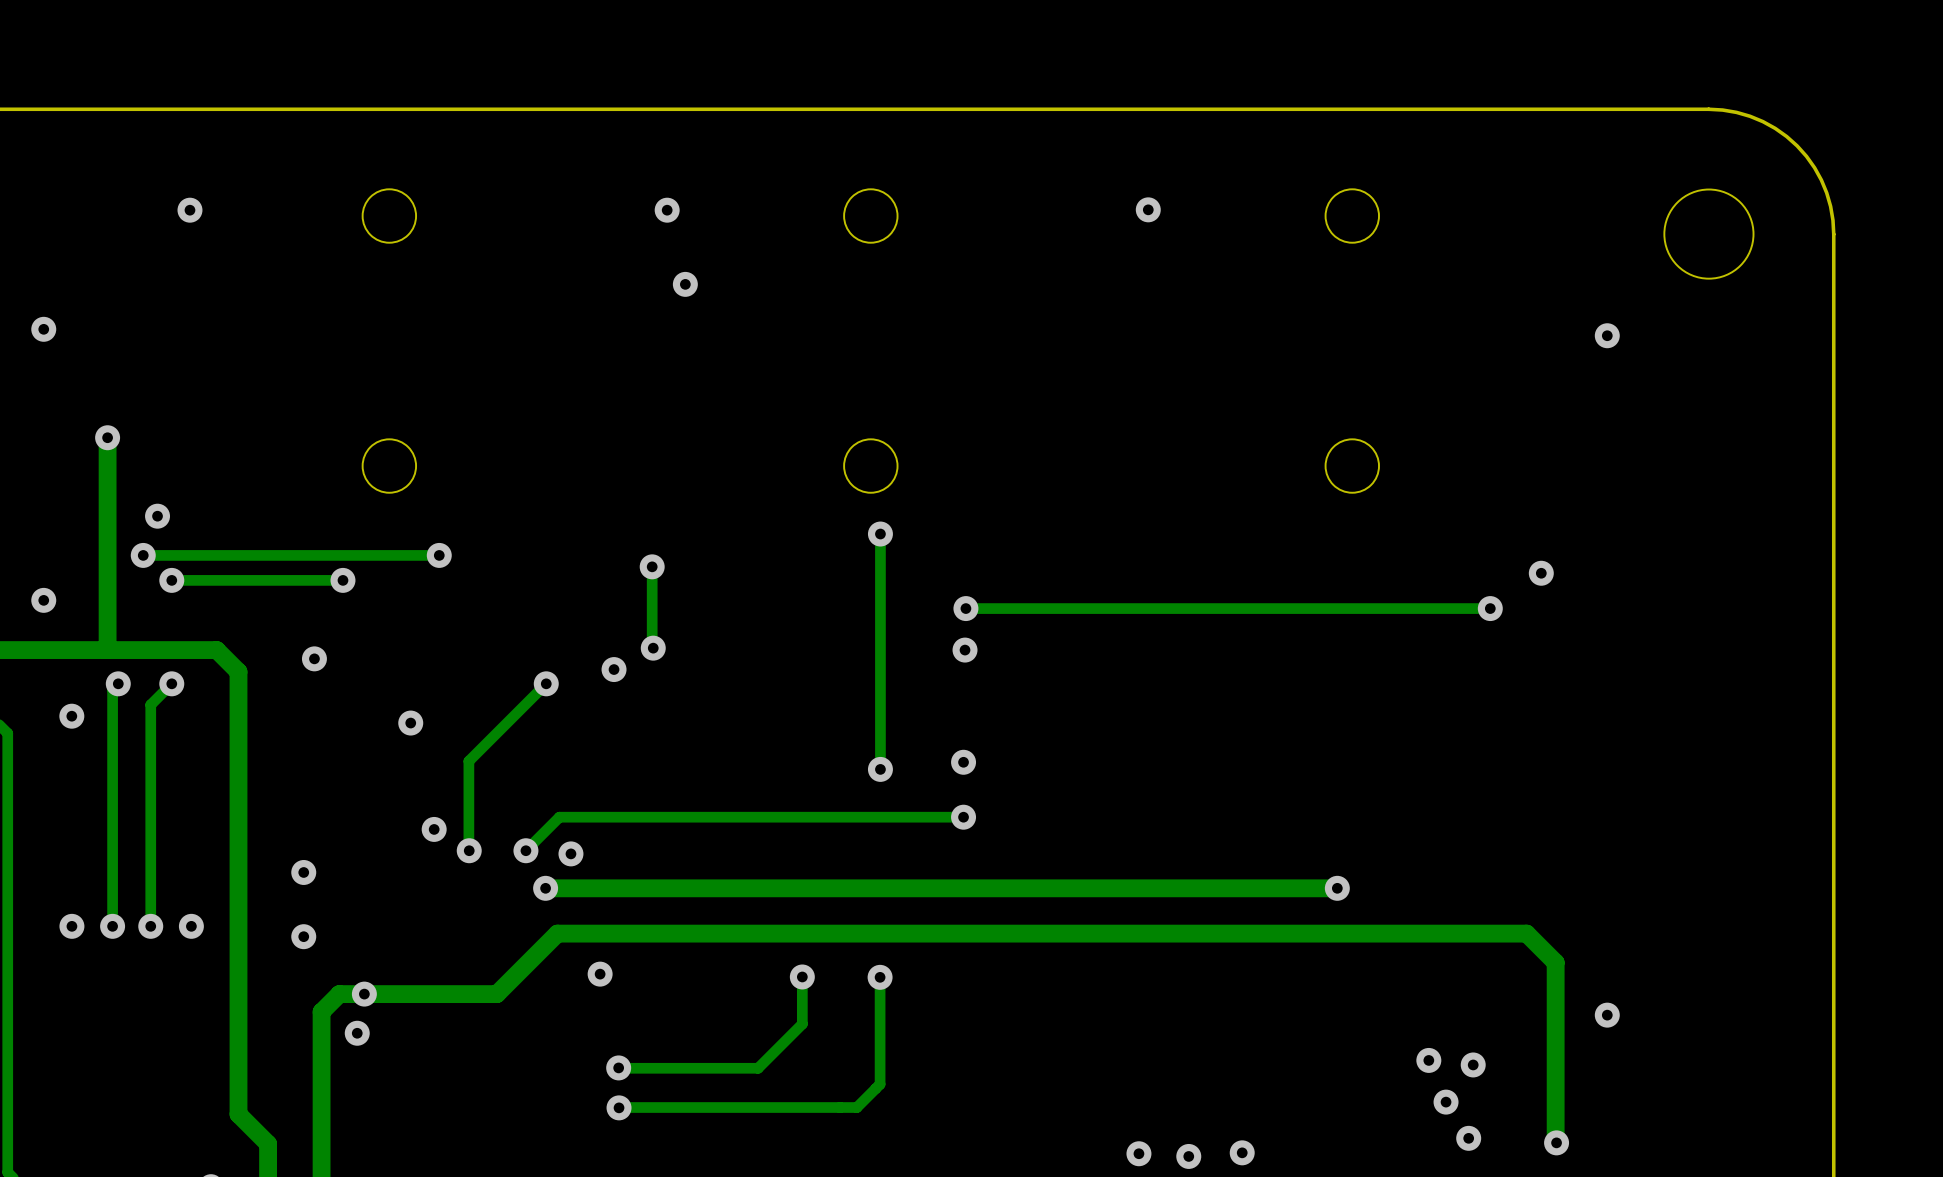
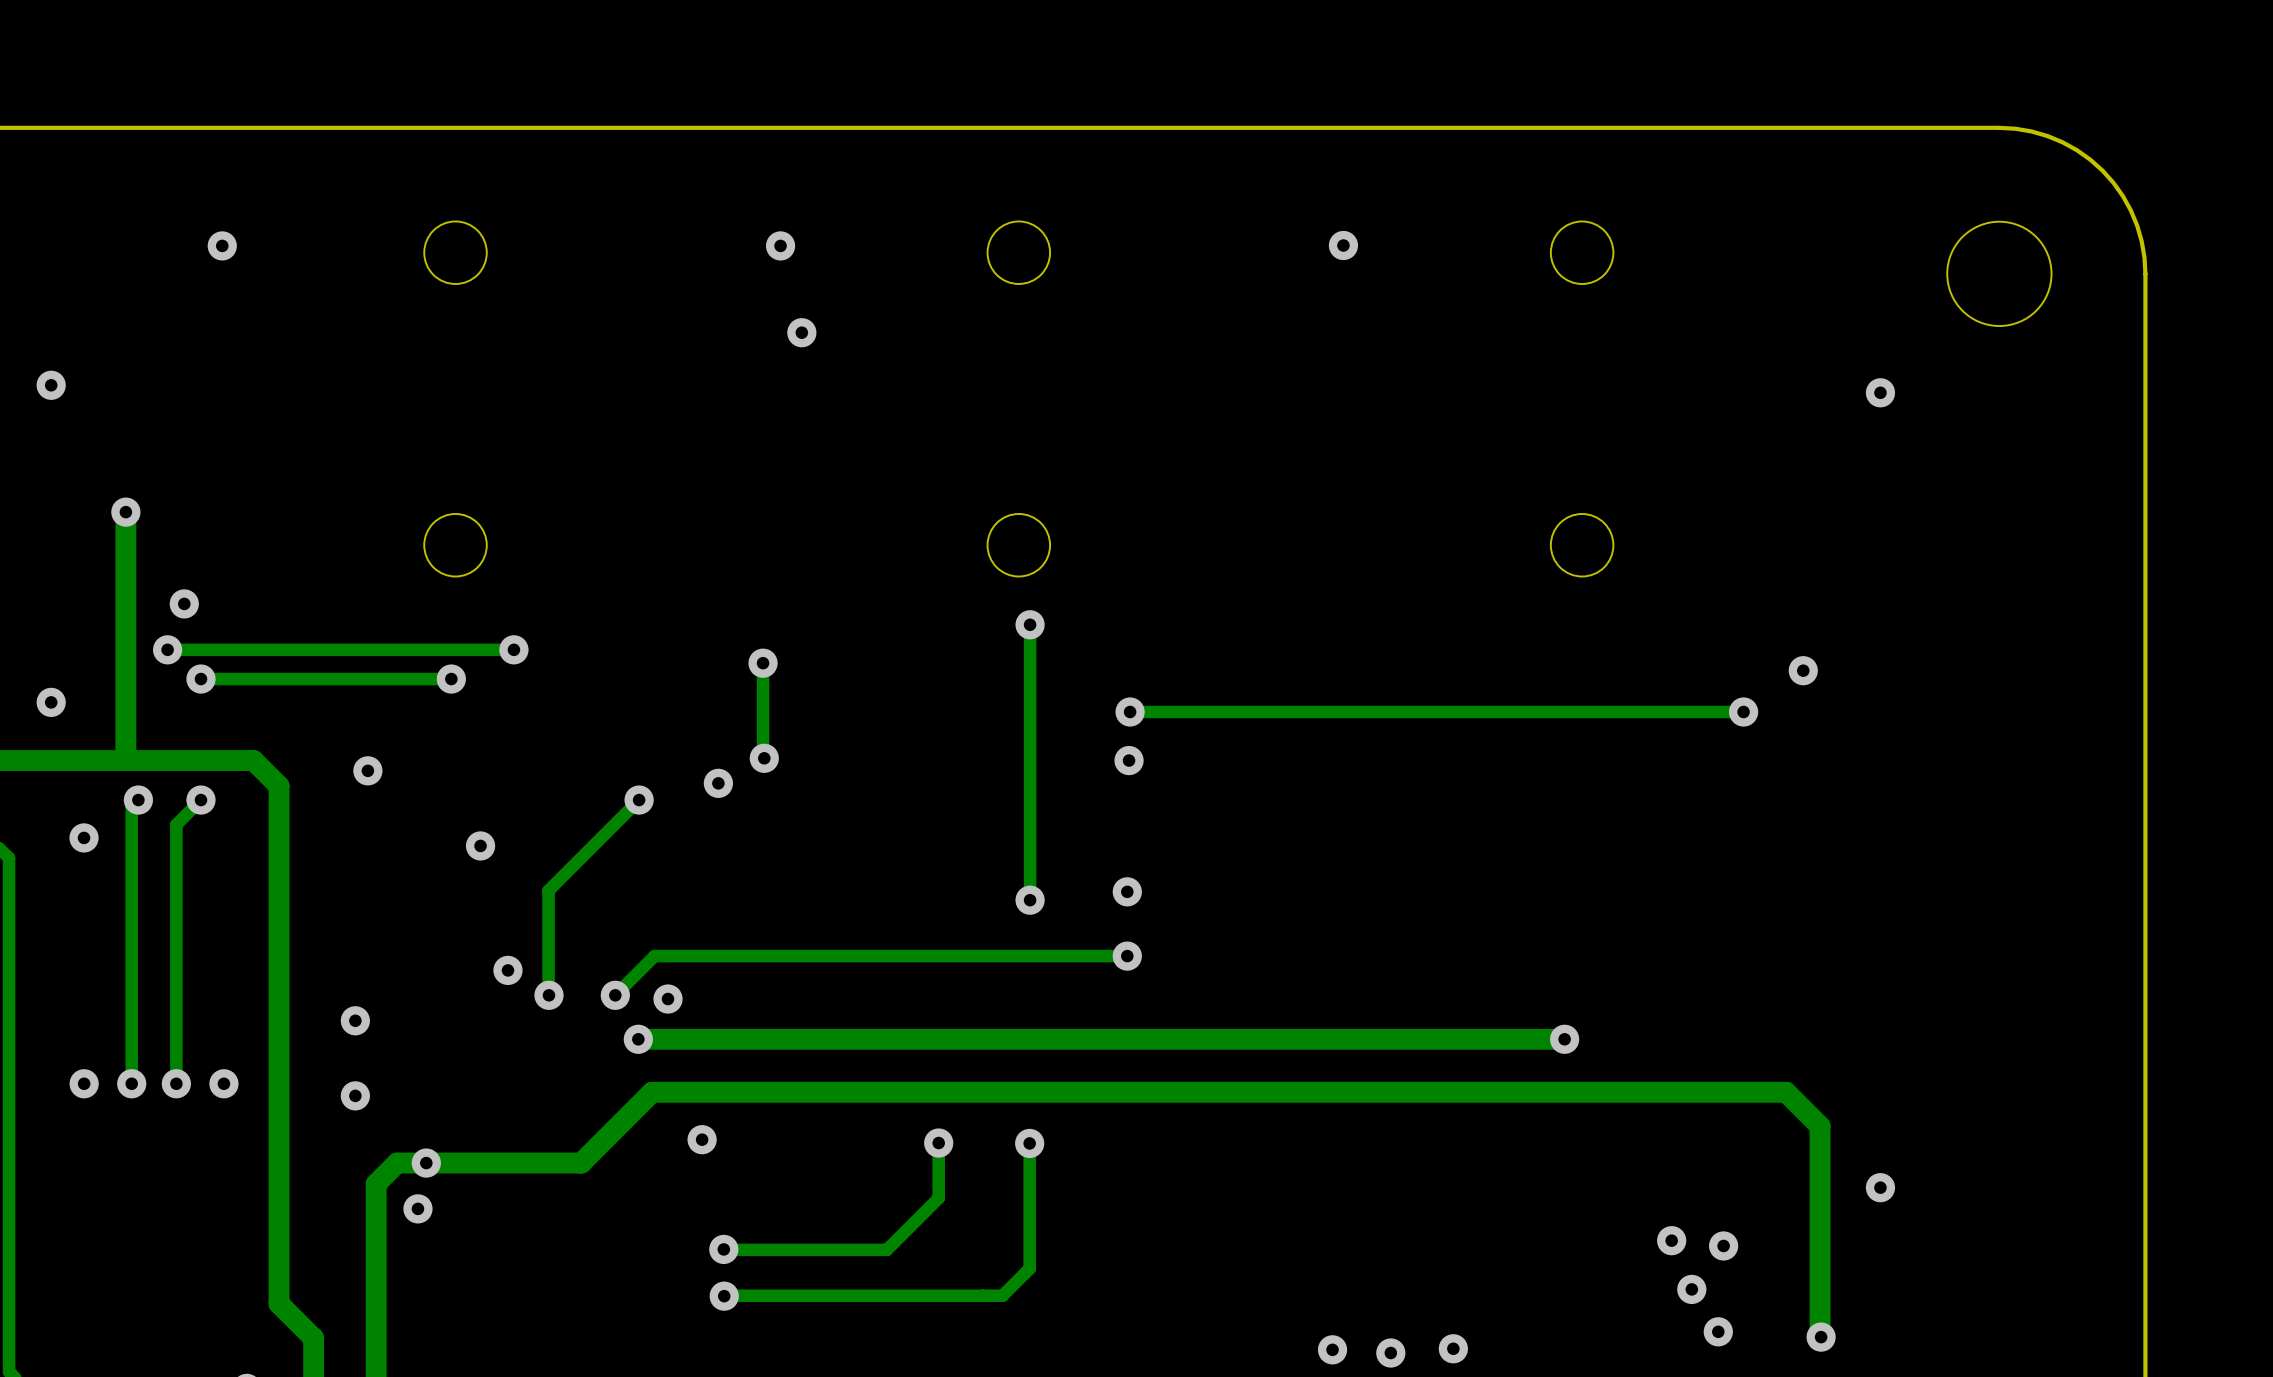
via position: (342, 580) -> (451, 679)
track: none -> (451, 679) (401, 679)

